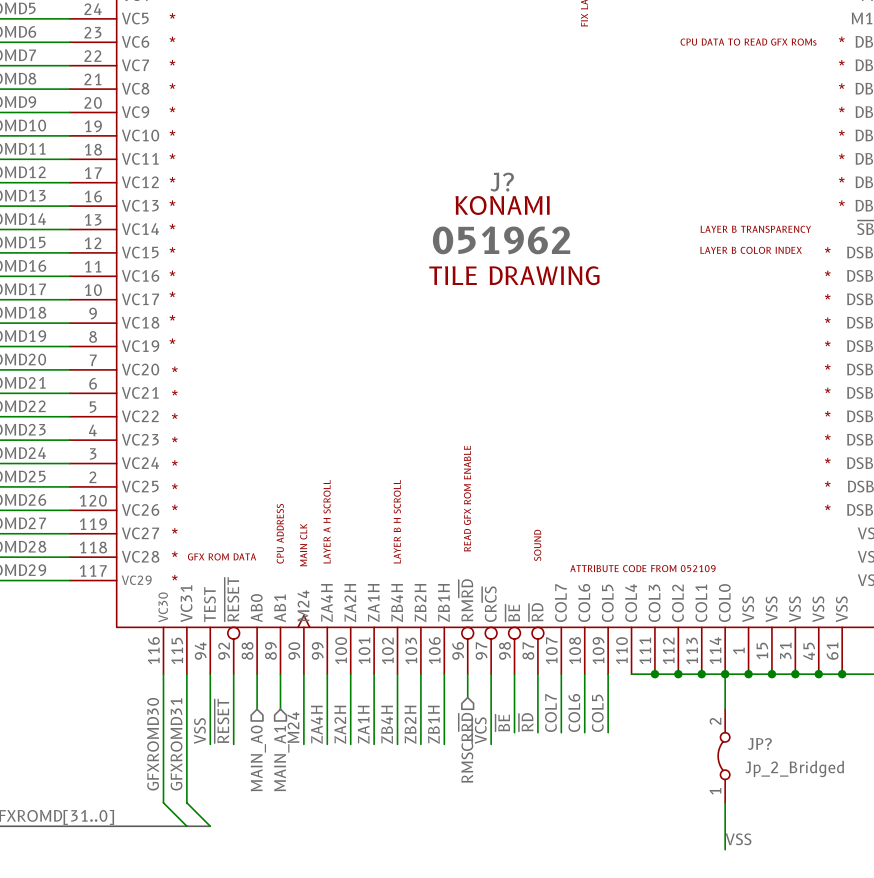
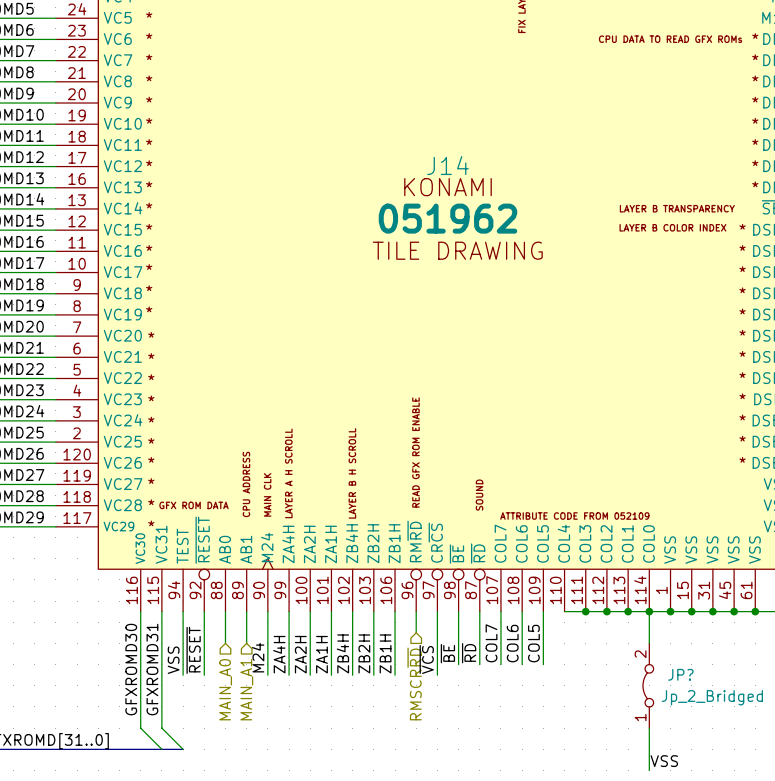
J? name: J? (502, 182) -> J14 (448, 165)

